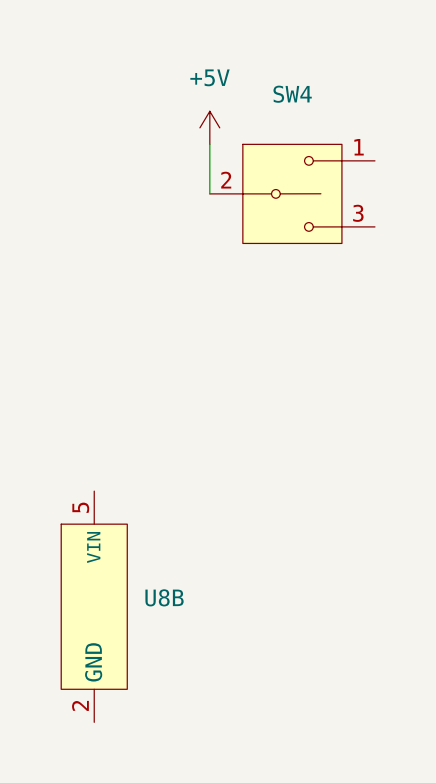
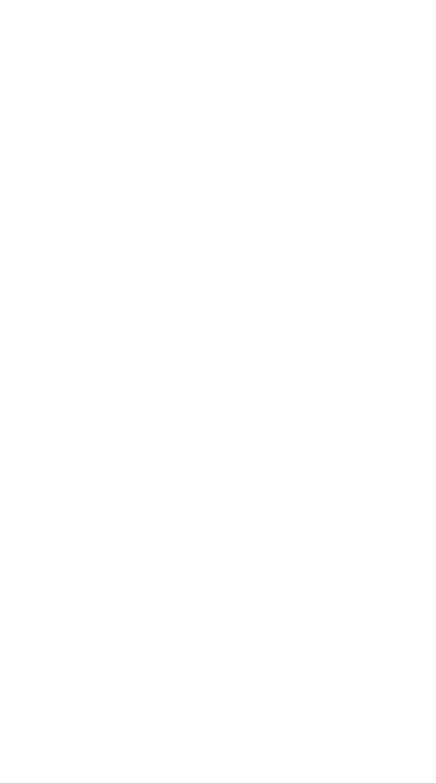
power symbol: +5V (209, 127) -> none
wire: (209, 144) (209, 193) -> none
SW4: (292, 193) -> none
U8B: (94, 606) -> none

